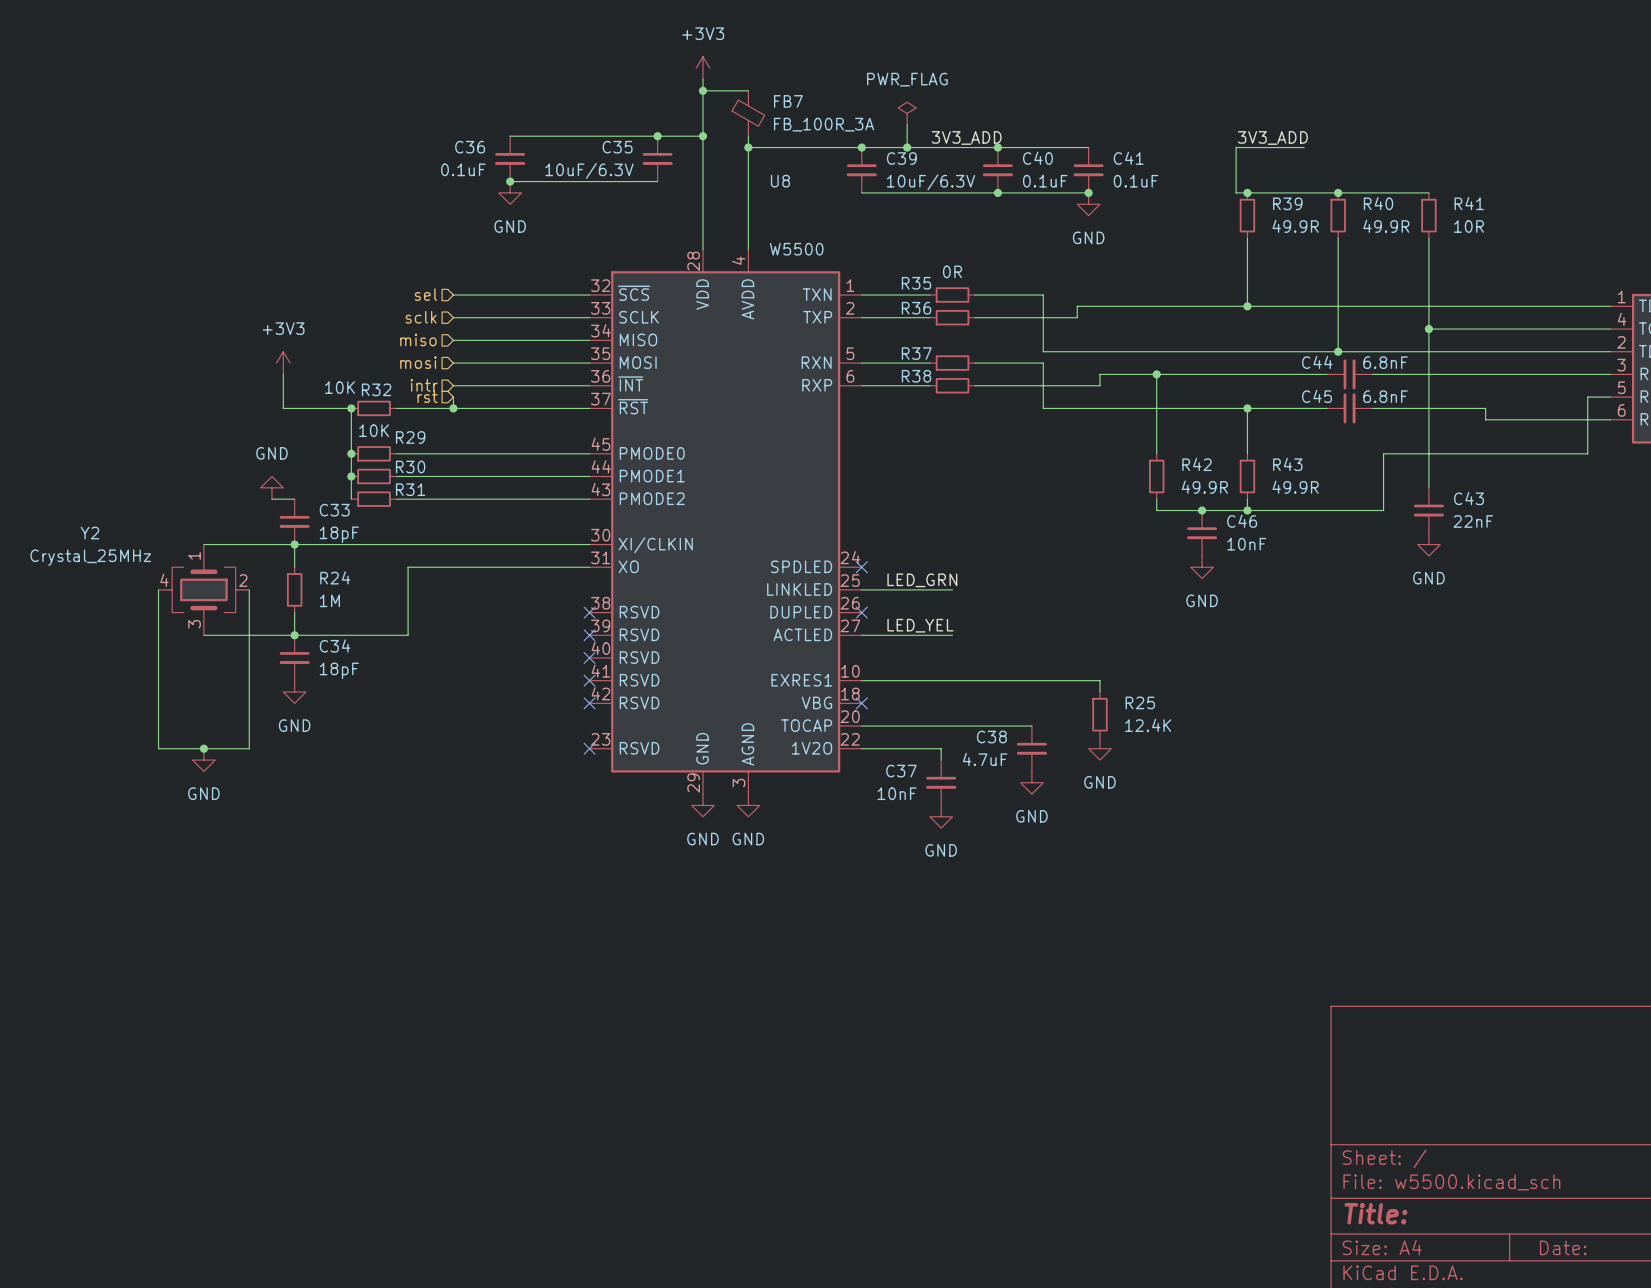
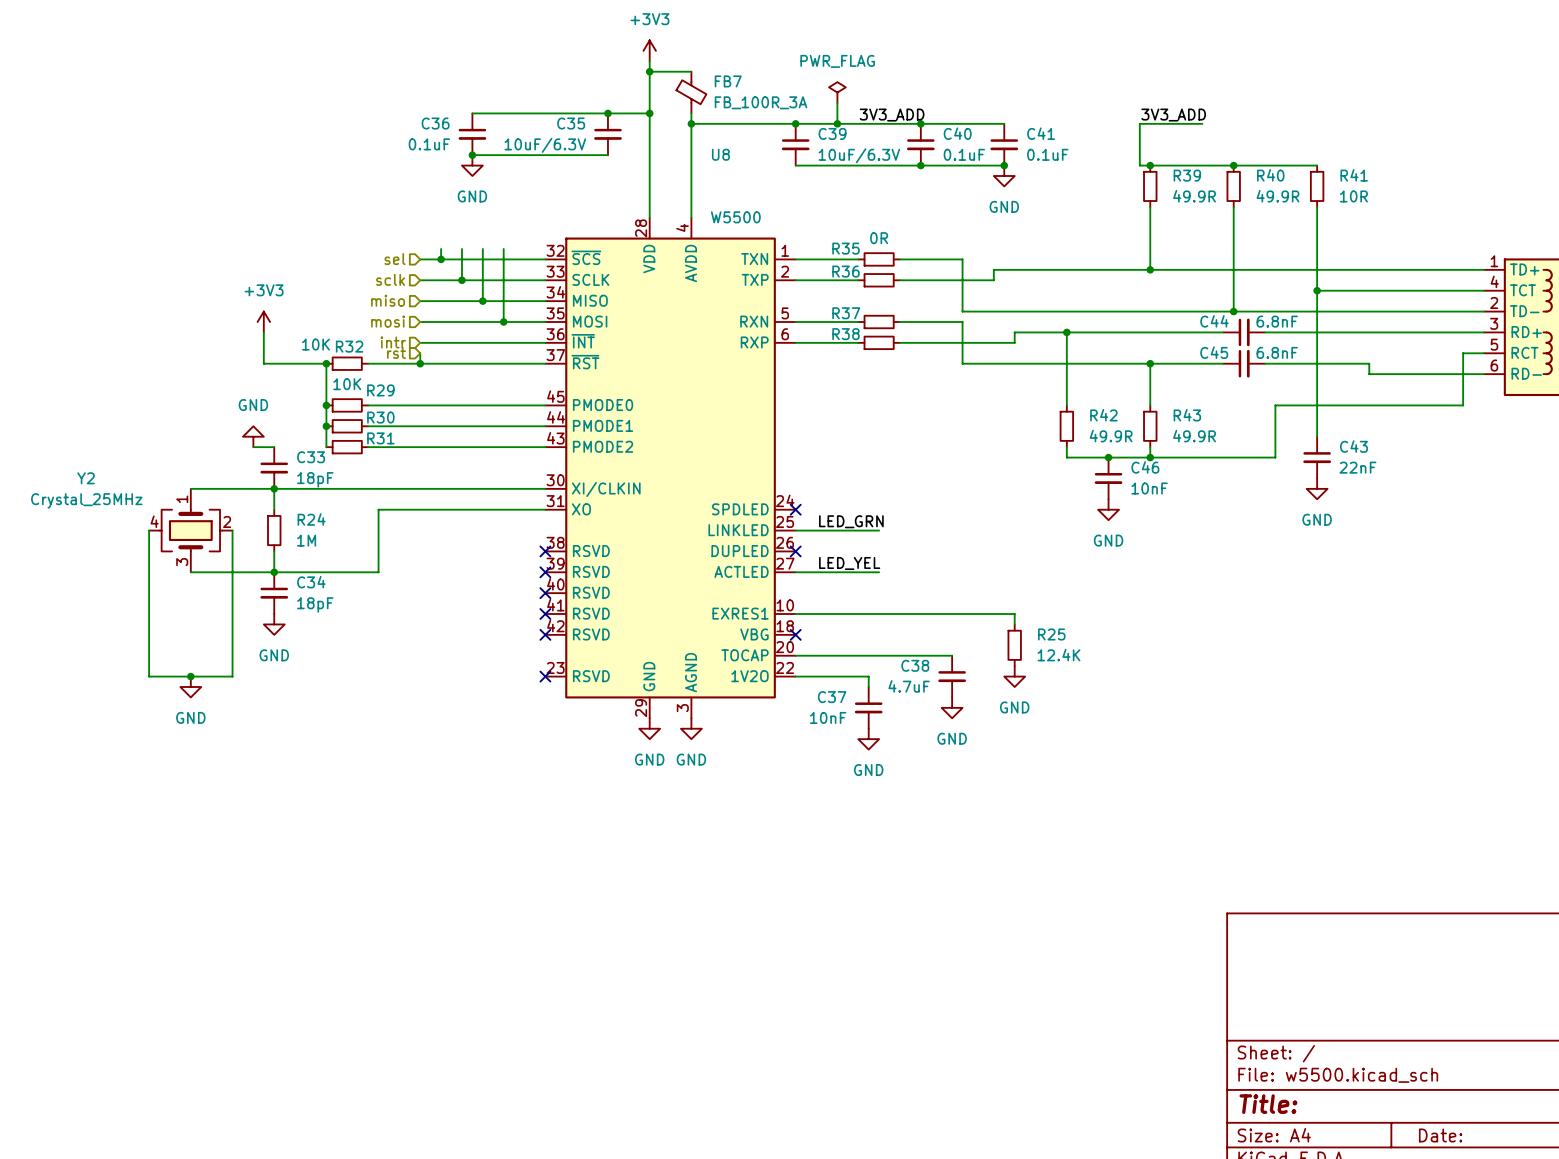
wire: none -> (441, 249) (441, 259)
wire: none -> (461, 249) (461, 280)
wire: none -> (482, 249) (482, 301)
wire: none -> (503, 249) (503, 322)
junction: none -> (441, 259)
junction: none -> (461, 280)
junction: none -> (482, 301)
junction: none -> (503, 322)

